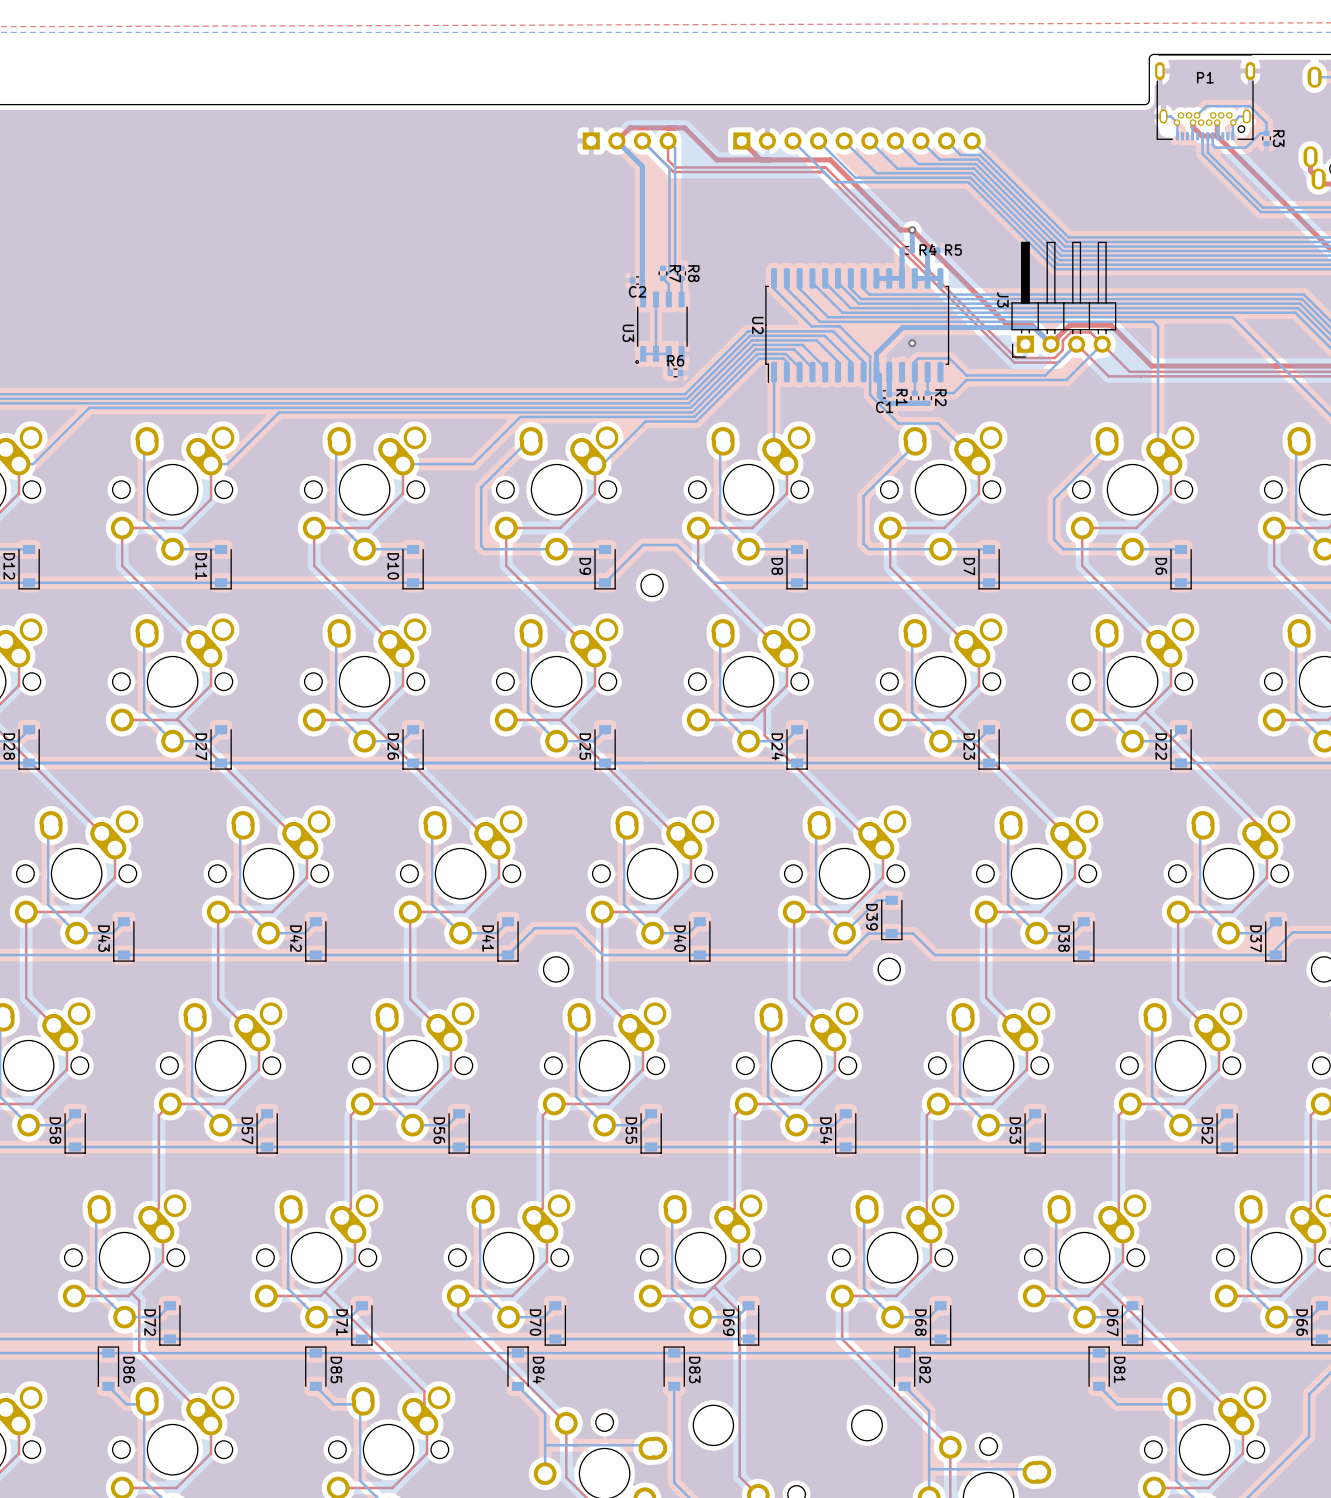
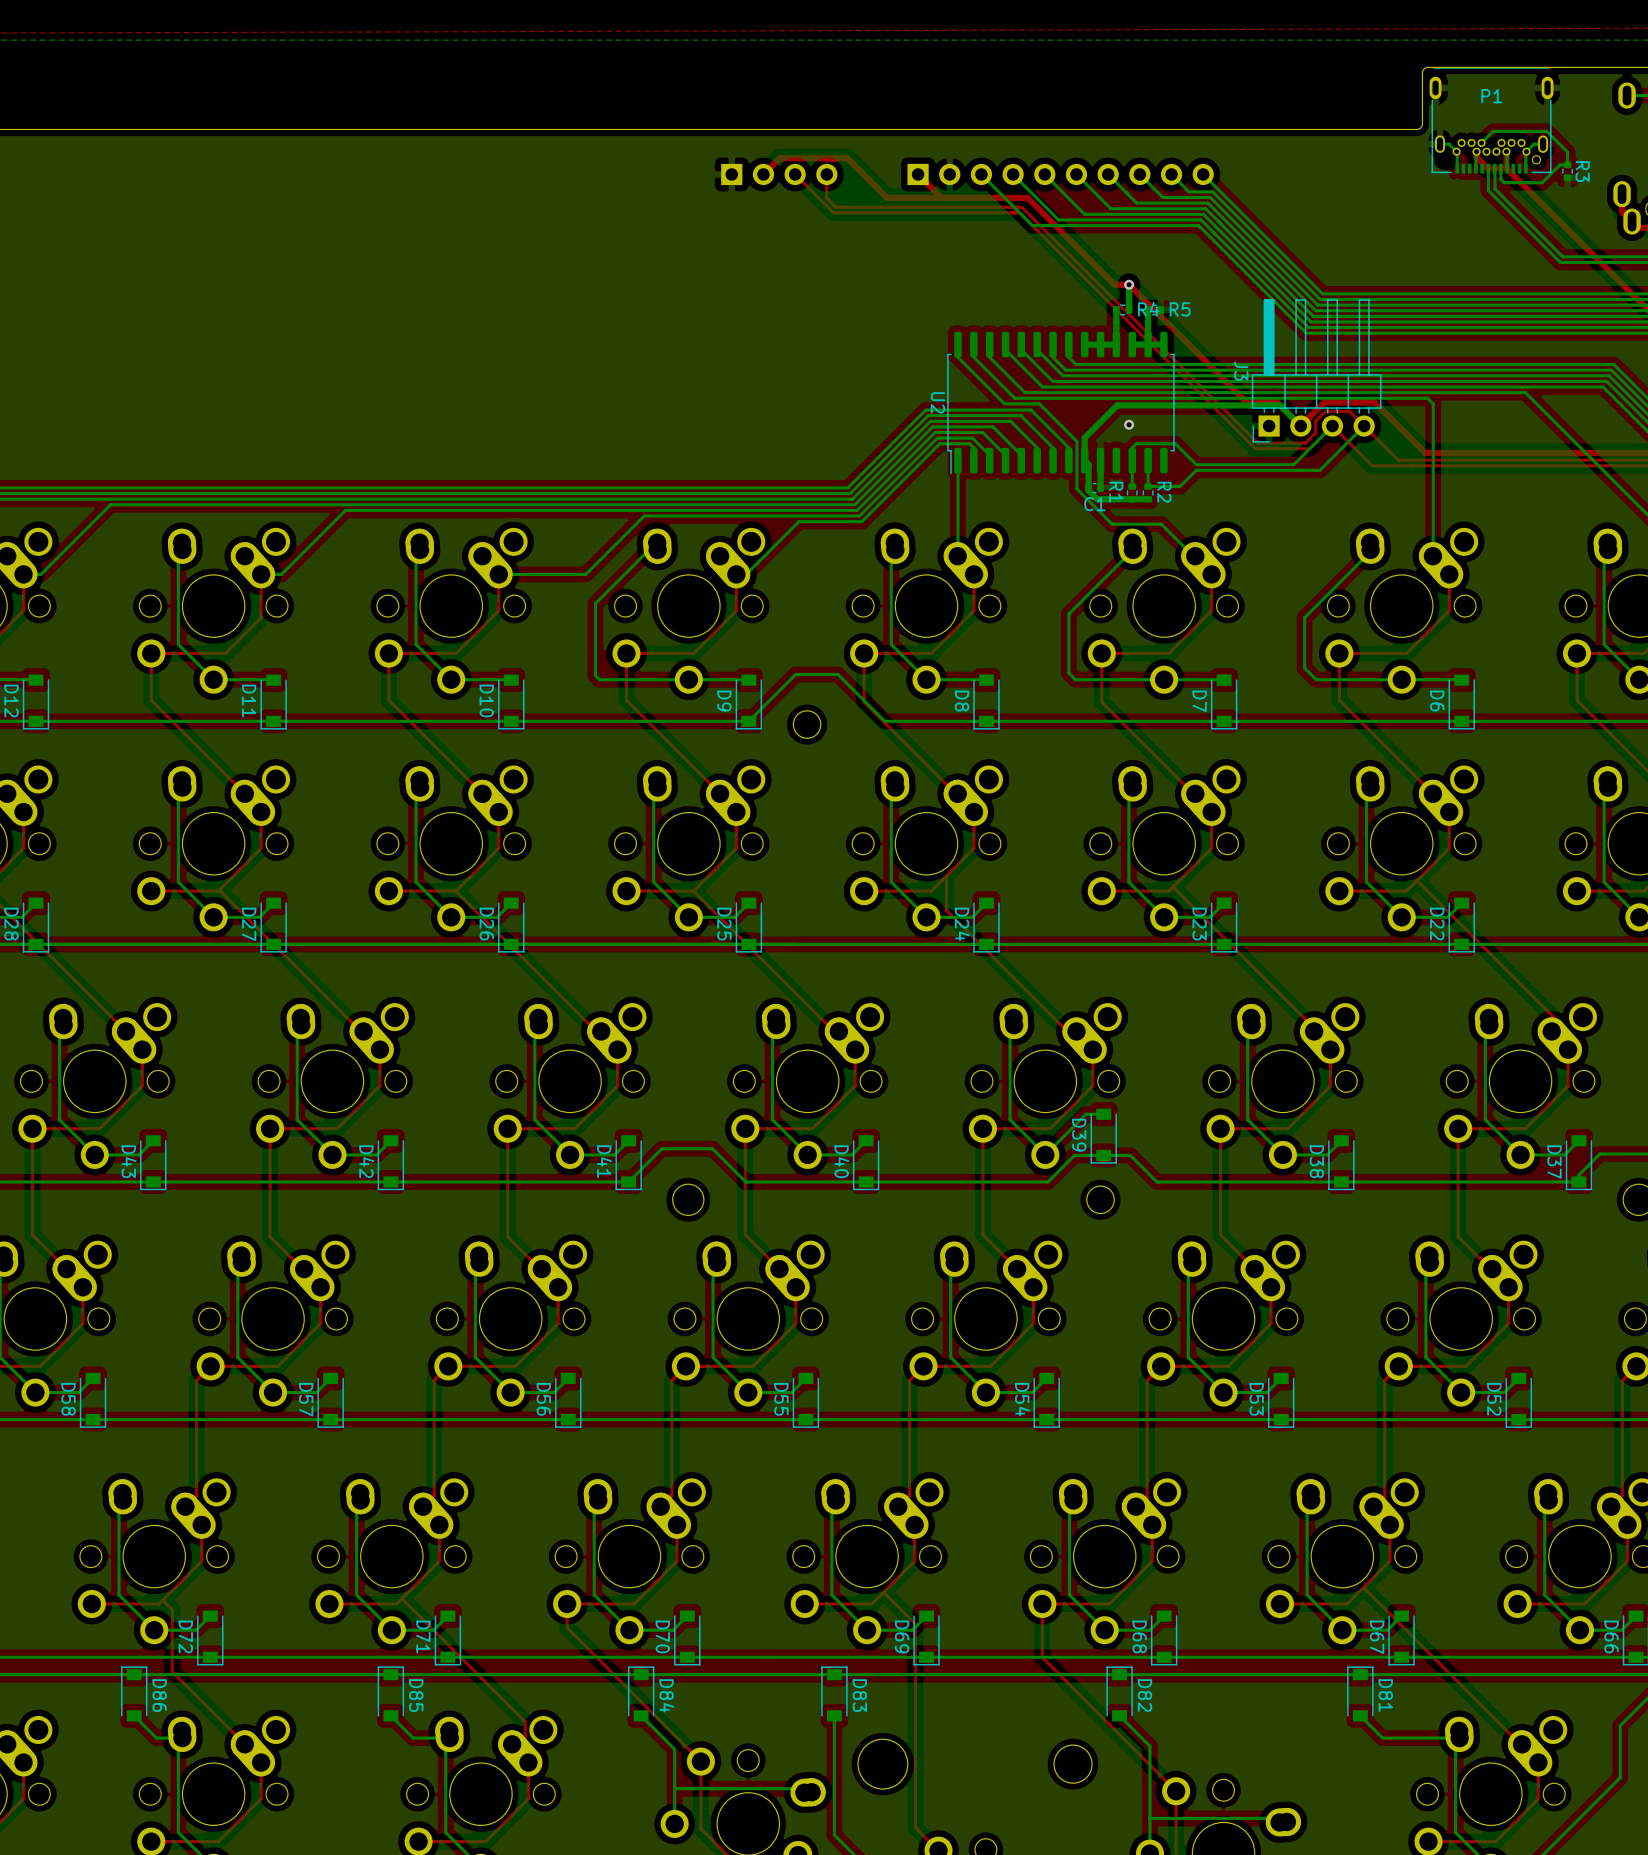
bottom track: (616, 140) (642, 166) (643, 299) -> none
bottom track: (642, 140) (669, 168) (669, 272) (663, 278) (668, 284) (668, 299) -> none
bottom track: (668, 140) (675, 148) (675, 272) (681, 278) (681, 299) -> none
R7: (663, 273) -> none
R8: (681, 273) -> none
C2: (637, 280) -> none
bottom track: (656, 299) (656, 353) -> none
U3: (661, 327) -> none
bottom track: (643, 353) (668, 353) (670, 372) -> none
R6: (675, 372) -> none

